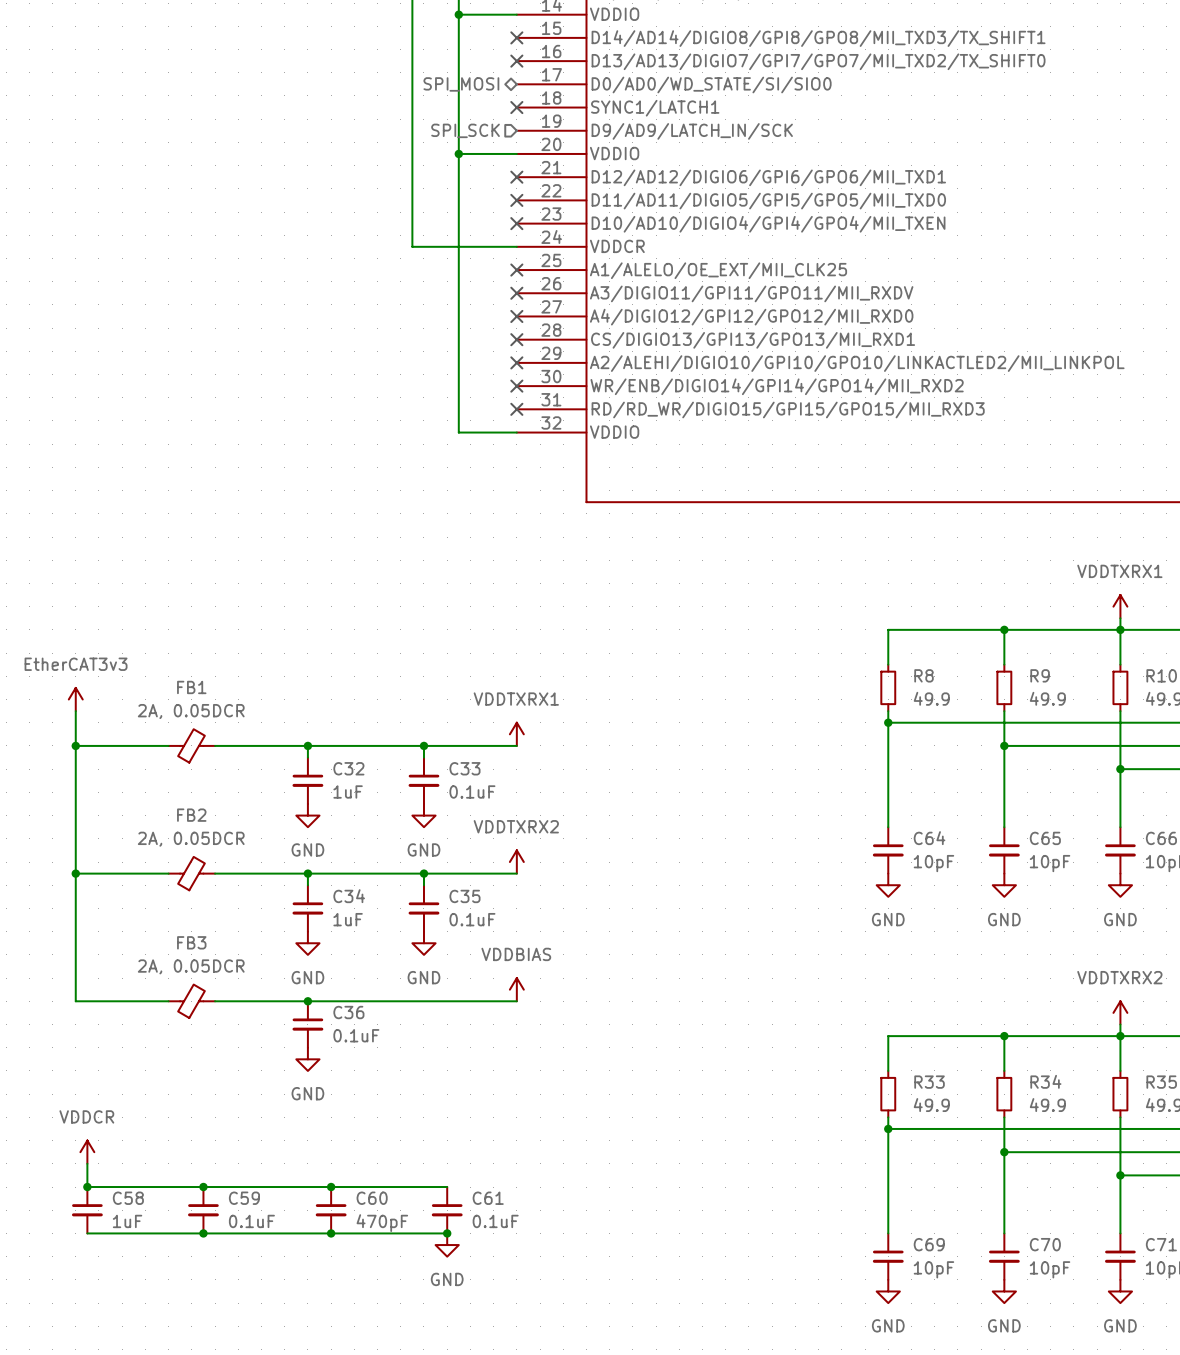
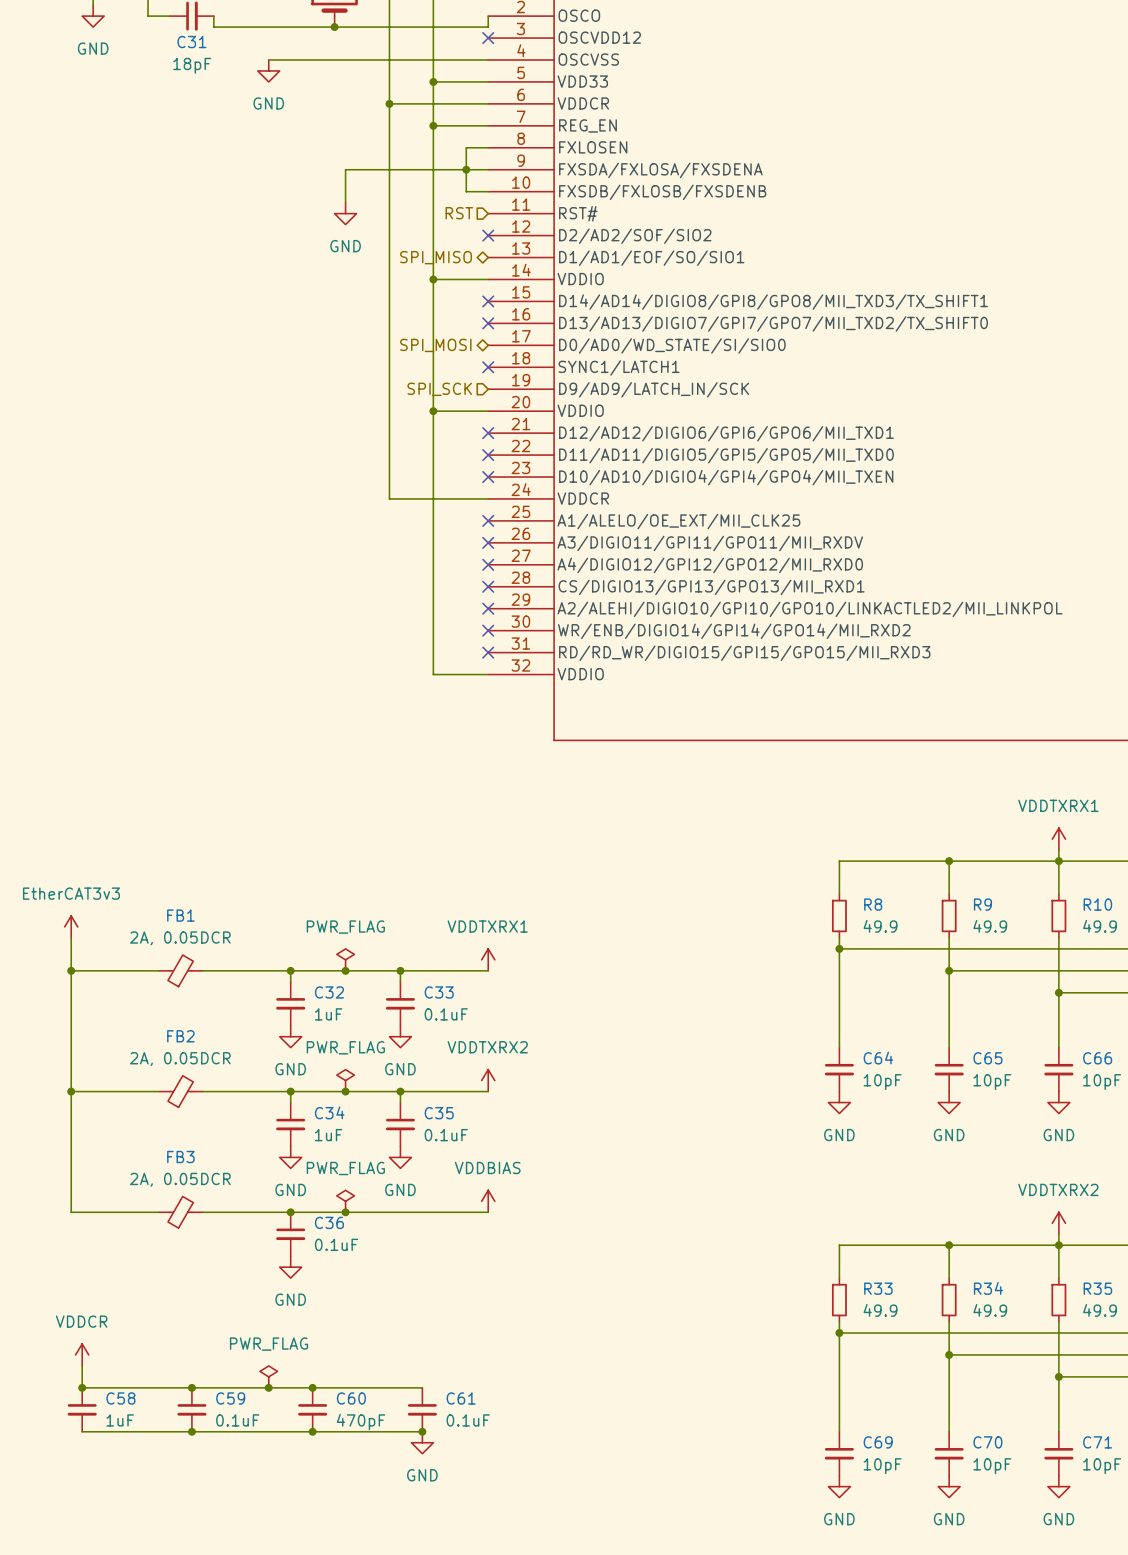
power symbol: none -> PWR_FLAG (345, 959)
junction: none -> (345, 970)
power symbol: none -> PWR_FLAG (345, 1080)
junction: none -> (345, 1091)
power symbol: none -> PWR_FLAG (345, 1201)
junction: none -> (345, 1212)
power symbol: none -> PWR_FLAG (268, 1376)
junction: none -> (268, 1387)

